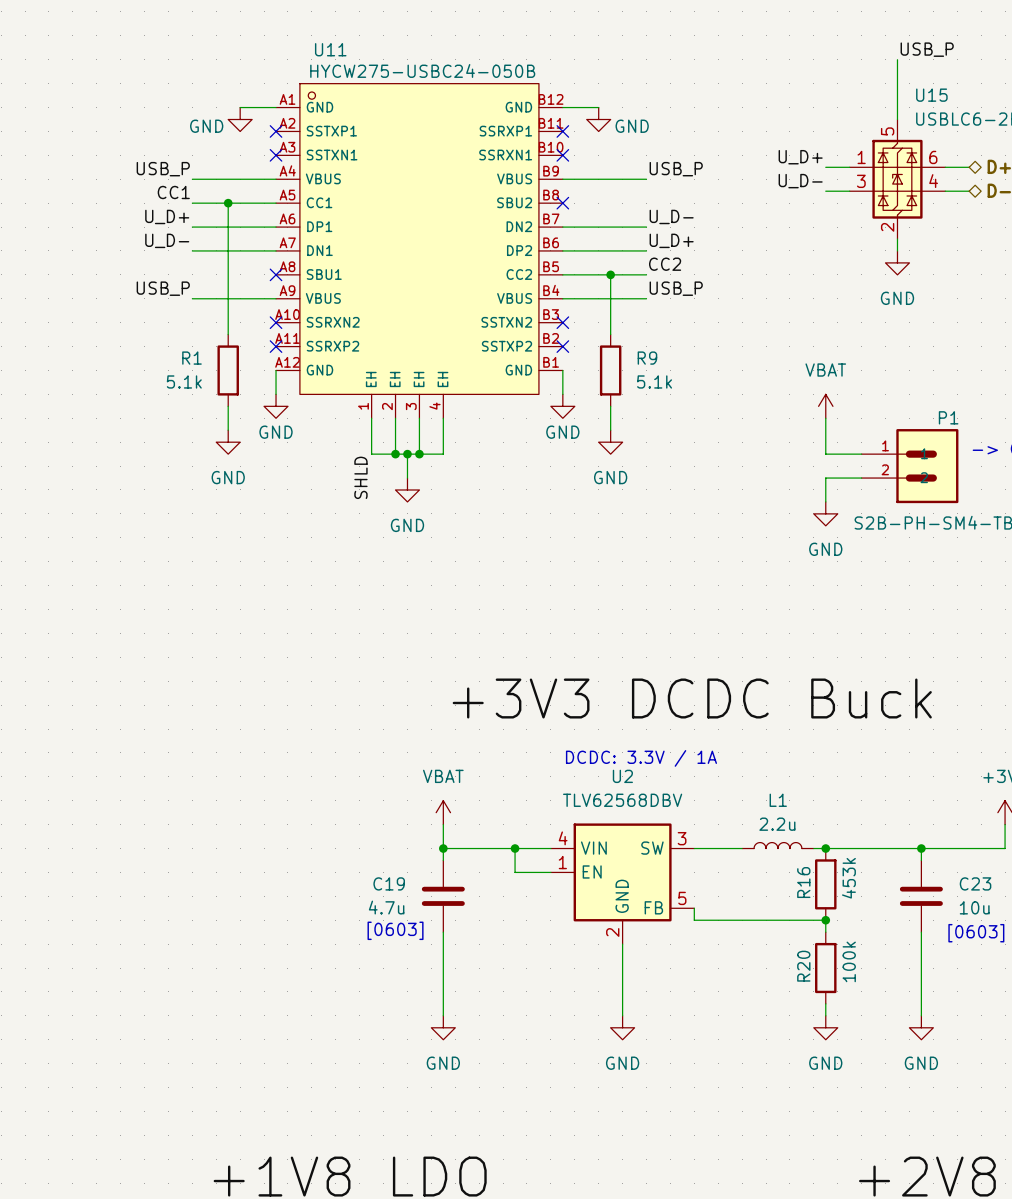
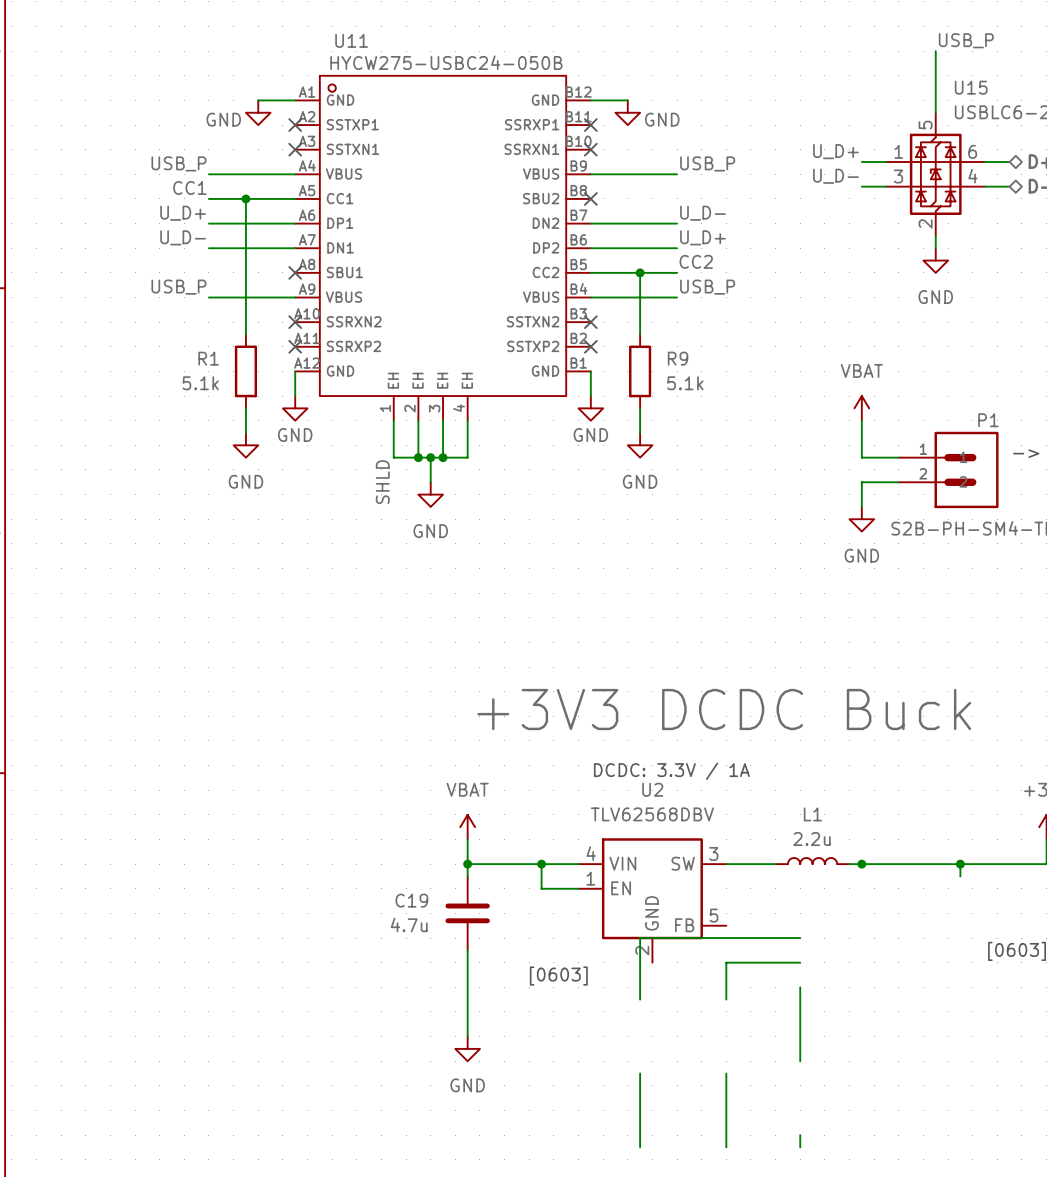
R16: 453k (825, 884) -> none
C23: 10u (921, 896) -> none
wire: (694, 908) (694, 920) -> (640, 999) (640, 938) (726, 938)
wire: (766, 920) (825, 920) (825, 932) -> none
junction: (825, 920) -> none
text position: [0603] (395, 930) -> [0603] (558, 976)
wire: (921, 932) (921, 1015) -> none
wire: (622, 944) (622, 1015) -> (640, 1073) (640, 1147)
wire: none -> (800, 962) (726, 962) (726, 999)
wire: none -> (800, 987) (800, 1061)
R20: 100k (825, 968) -> none
wire: (825, 1003) (825, 1015) -> (800, 1135) (800, 1147)
power symbol: GND (622, 1027) -> none
power symbol: GND (825, 1027) -> none
power symbol: GND (921, 1027) -> none
wire: none -> (726, 1073) (726, 1147)

